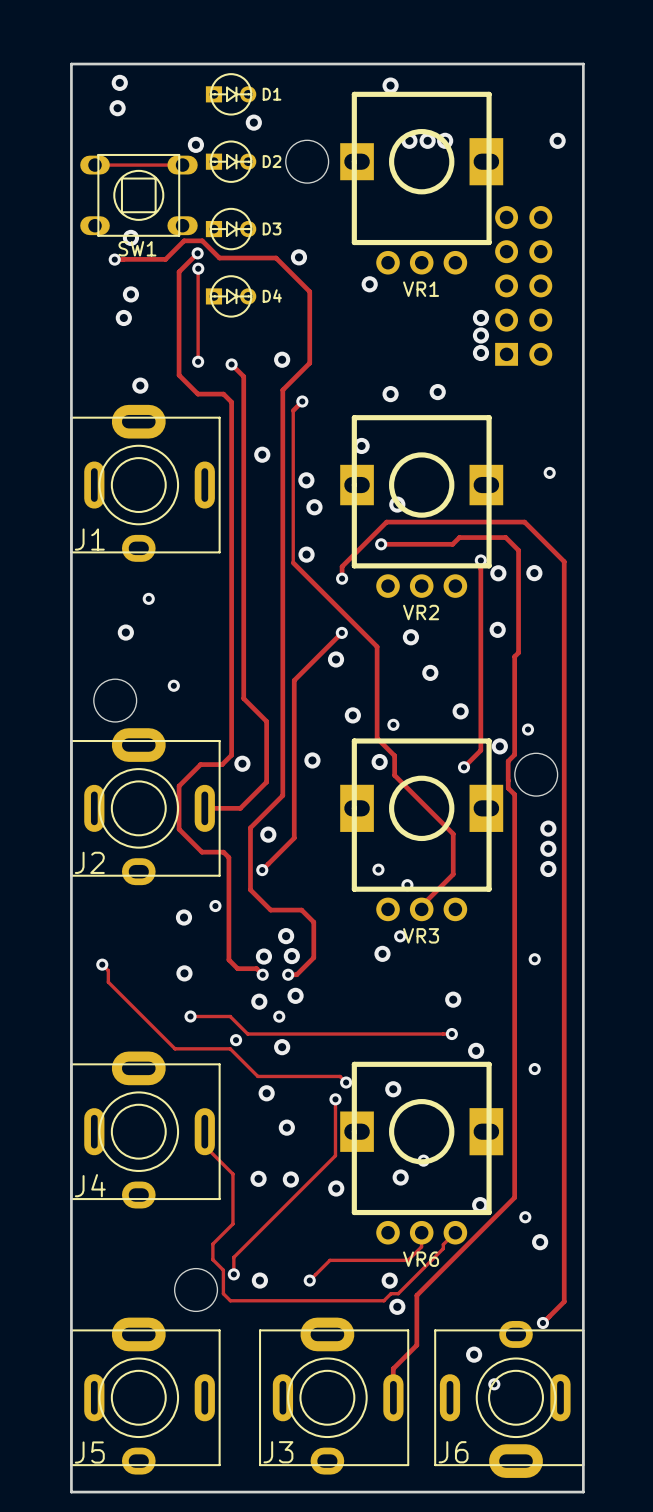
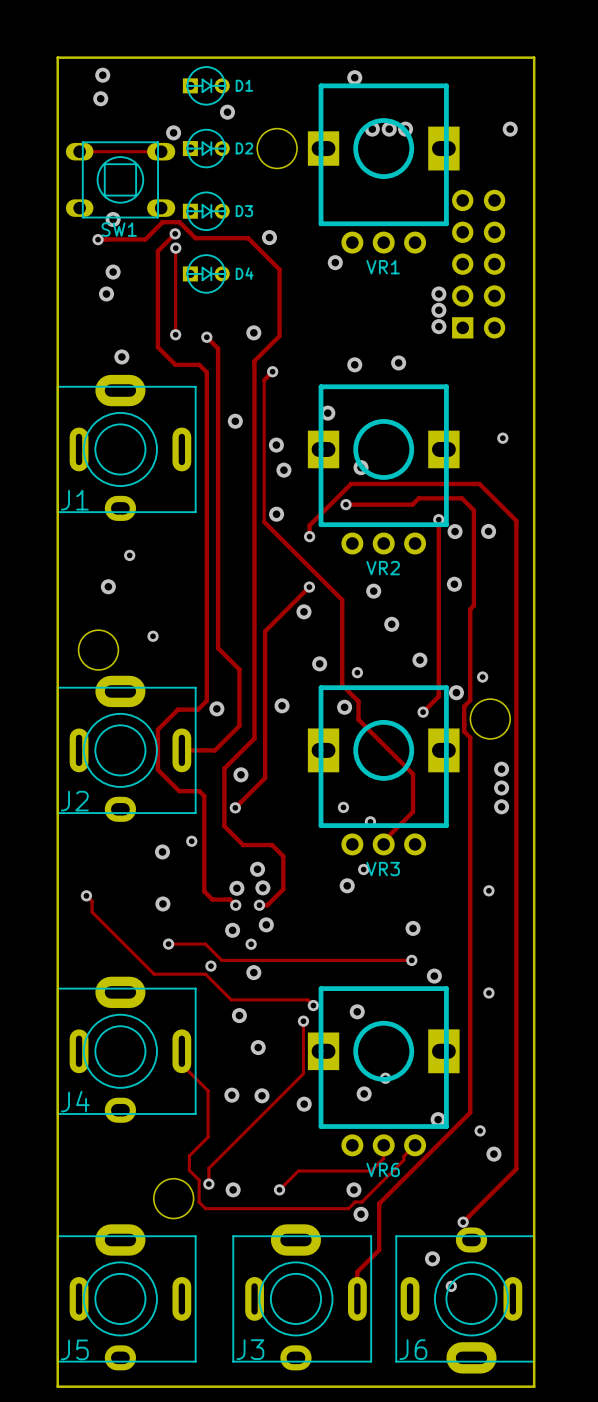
track: (564, 1258) (564, 1301) (542, 1322) -> (516, 1168) (463, 1222)
via position: (542, 1322) -> (463, 1222)

